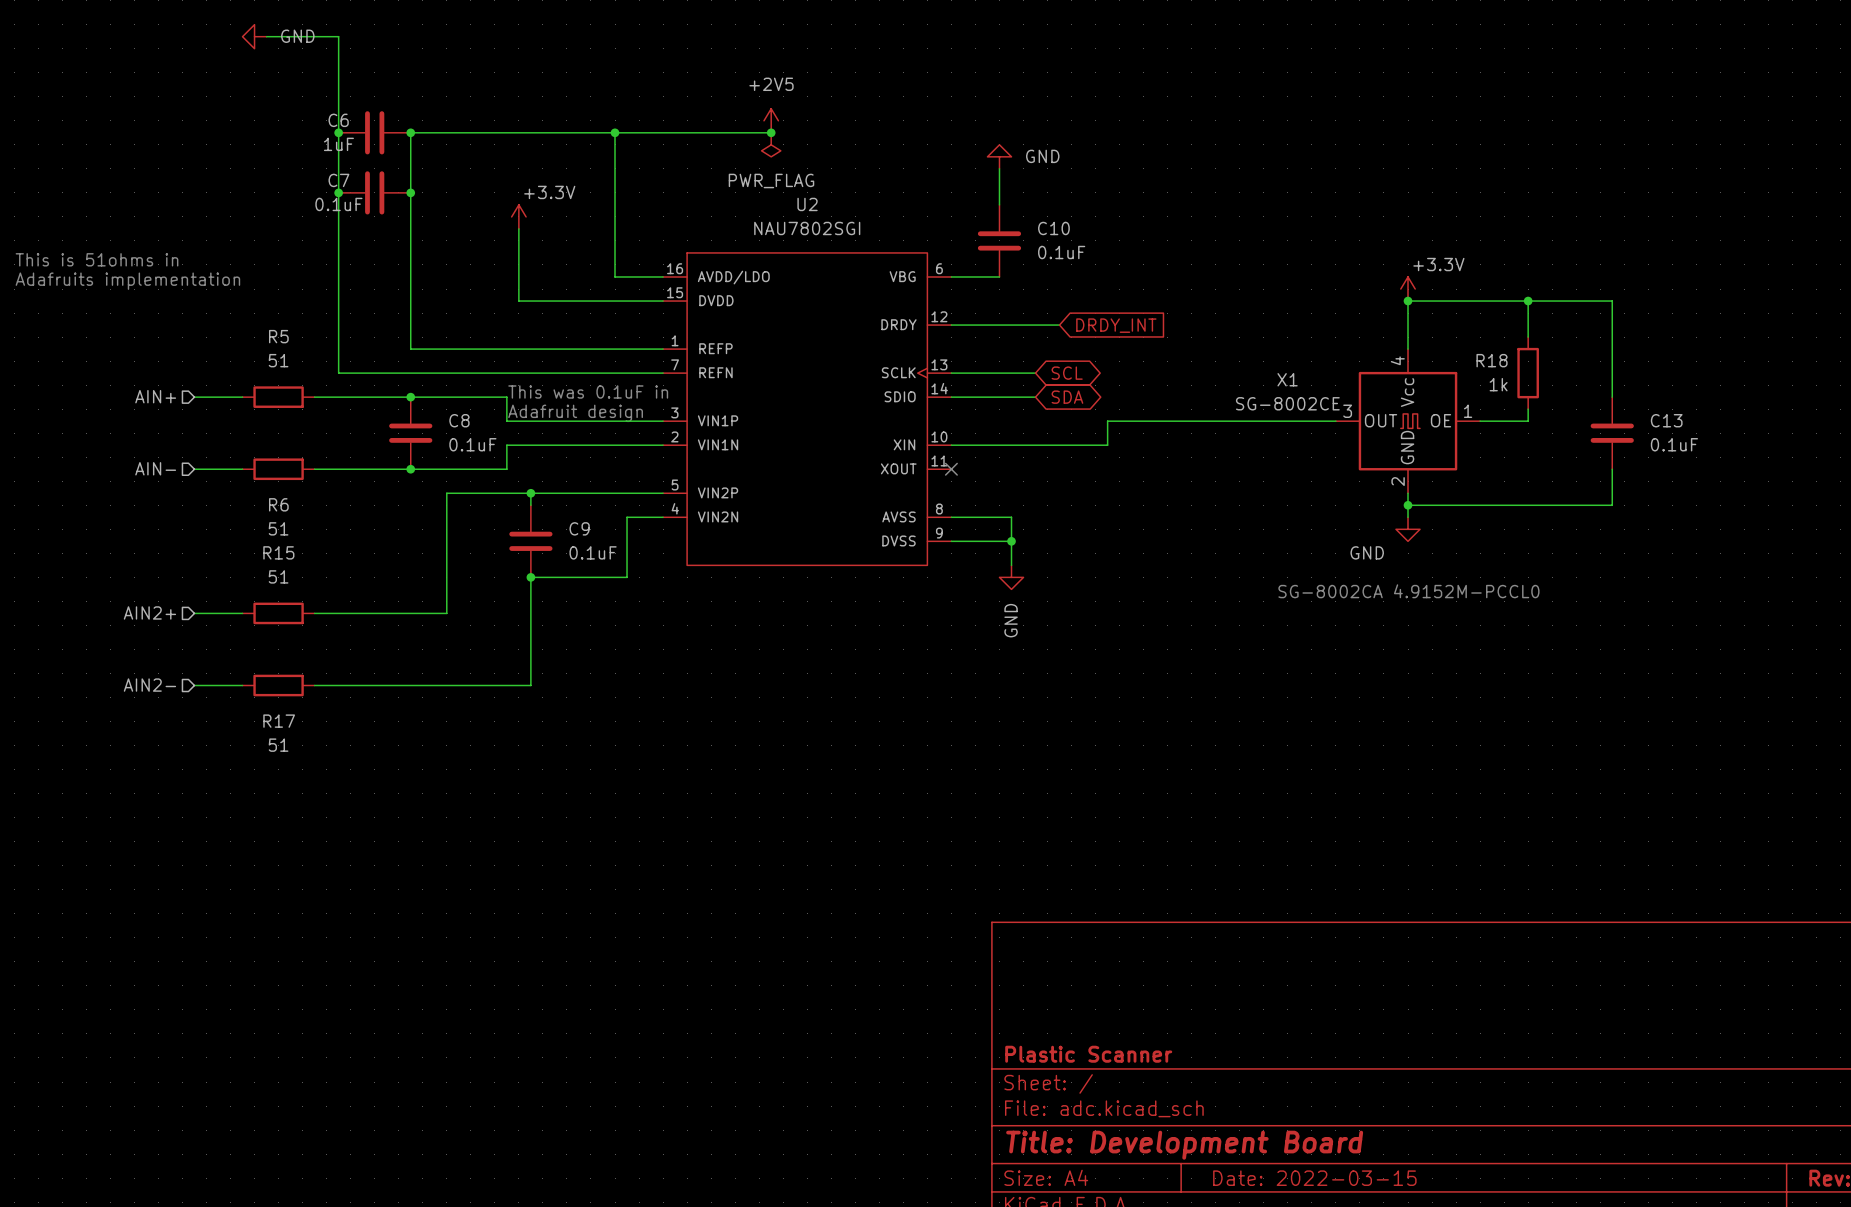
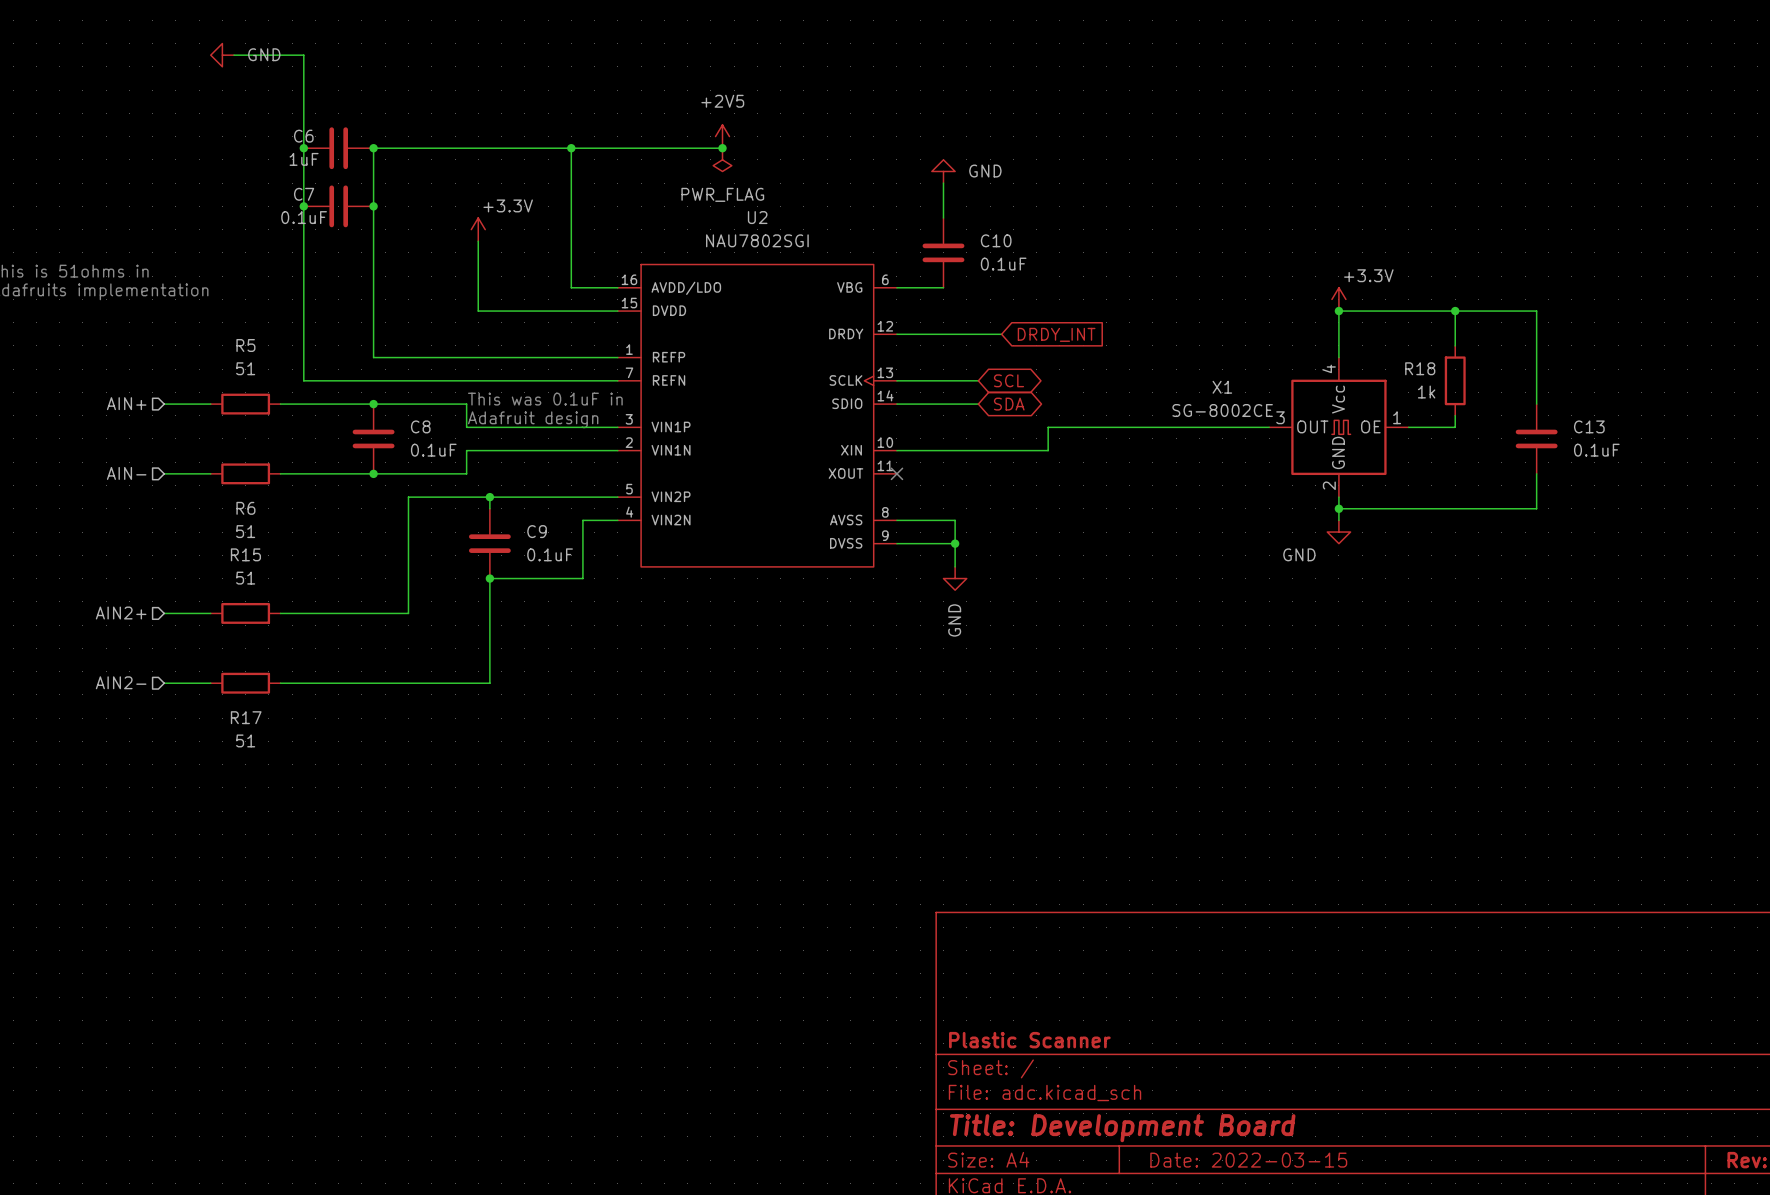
text: SG-8002CA 4.9152M-PCCL0 (1408, 591) -> none

